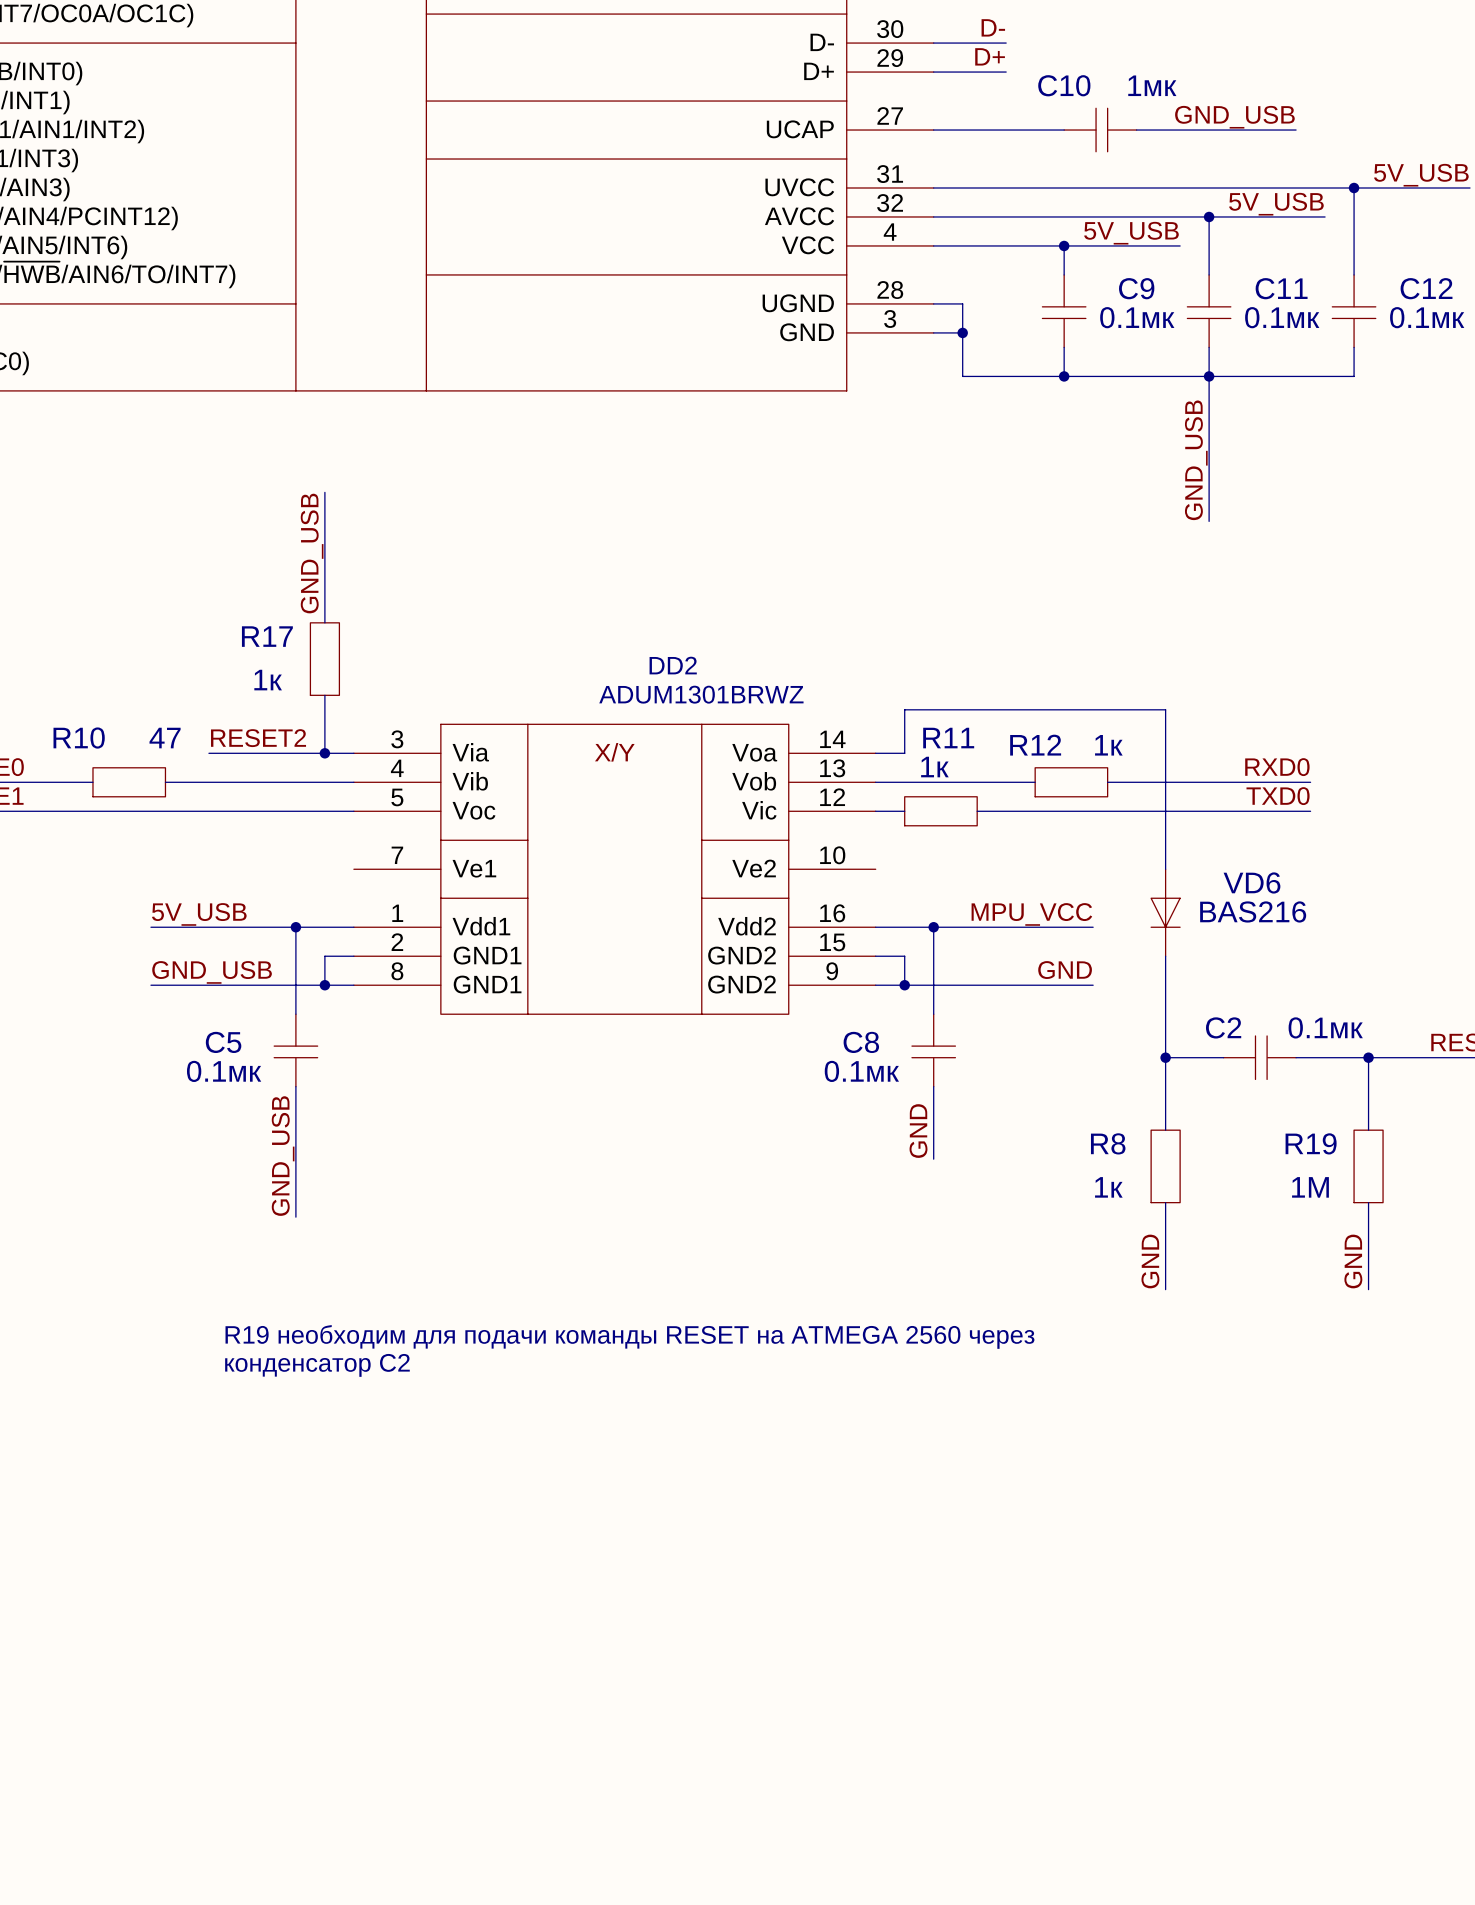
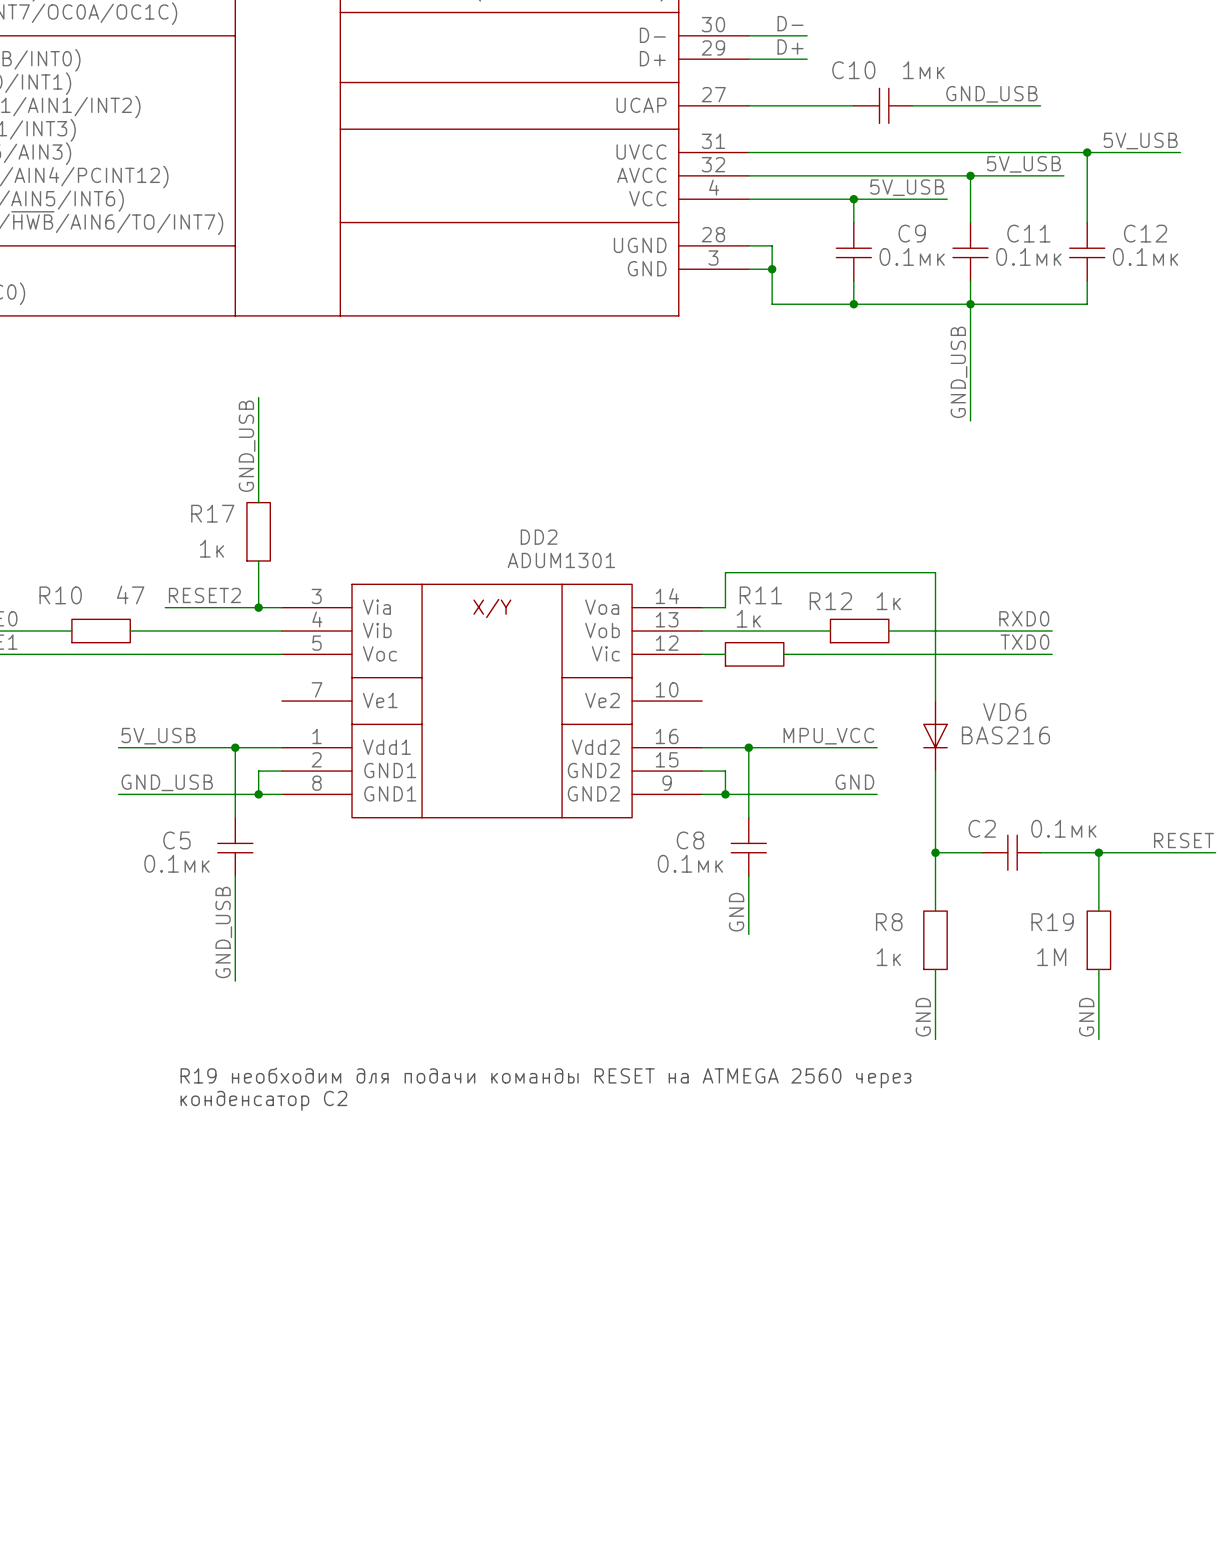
DD2 value: ADUM1301BRWZ (701, 694) -> ADUM1301 (561, 560)

